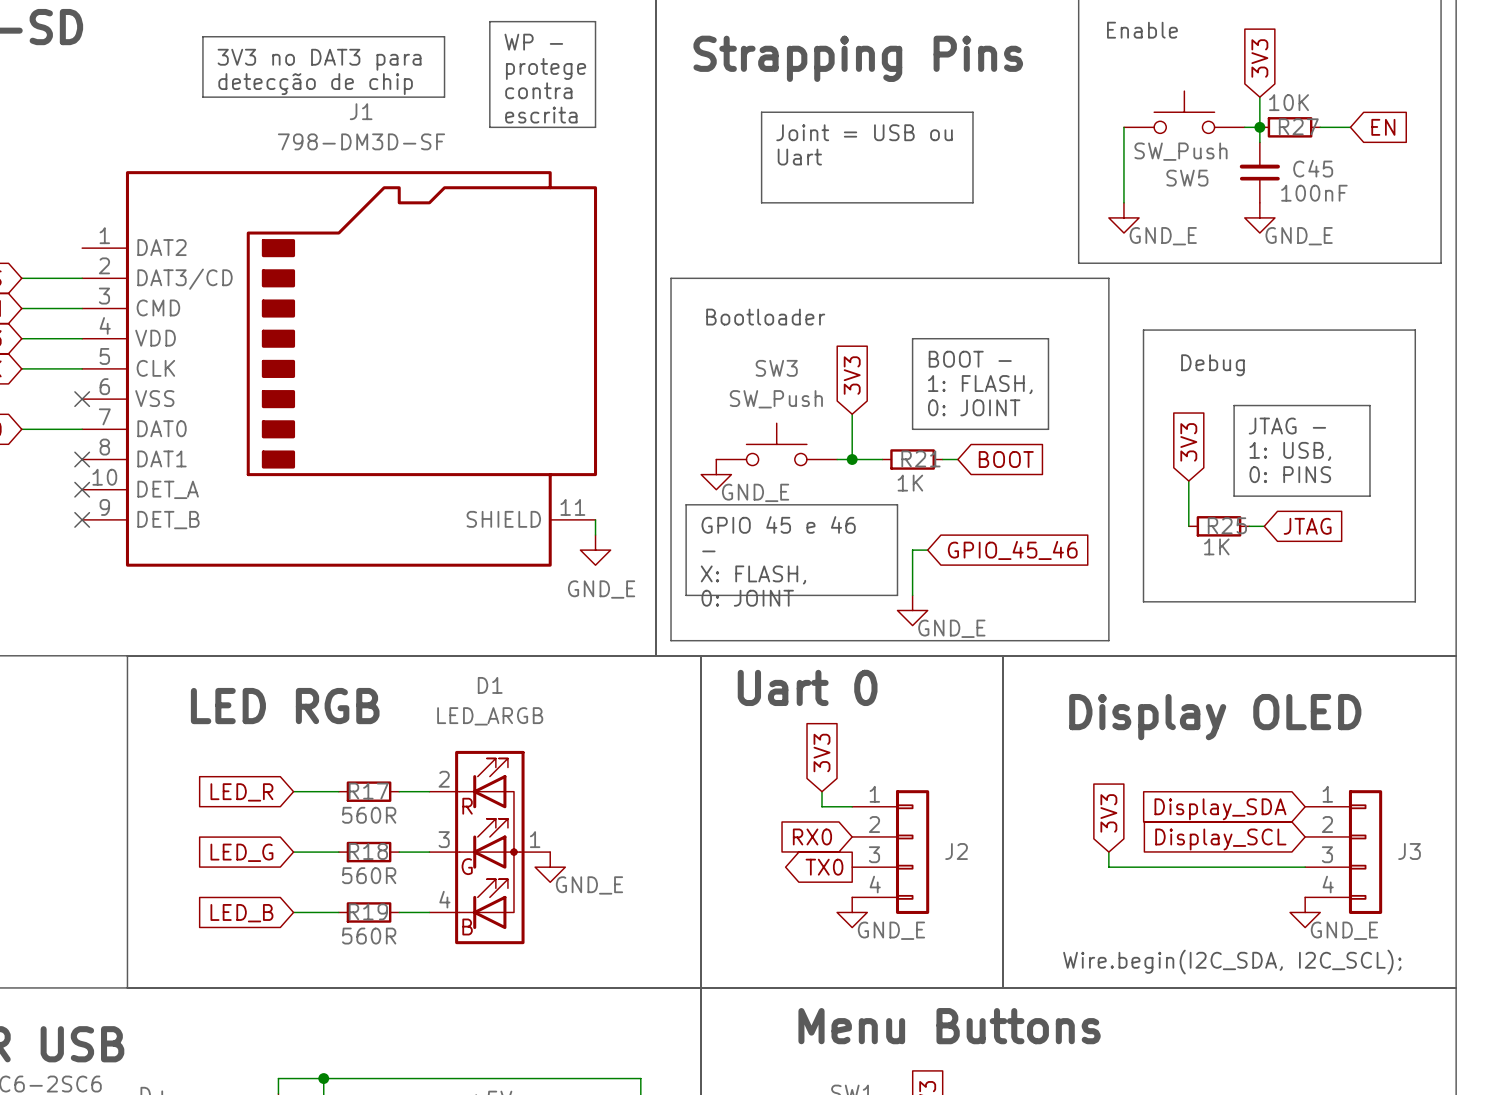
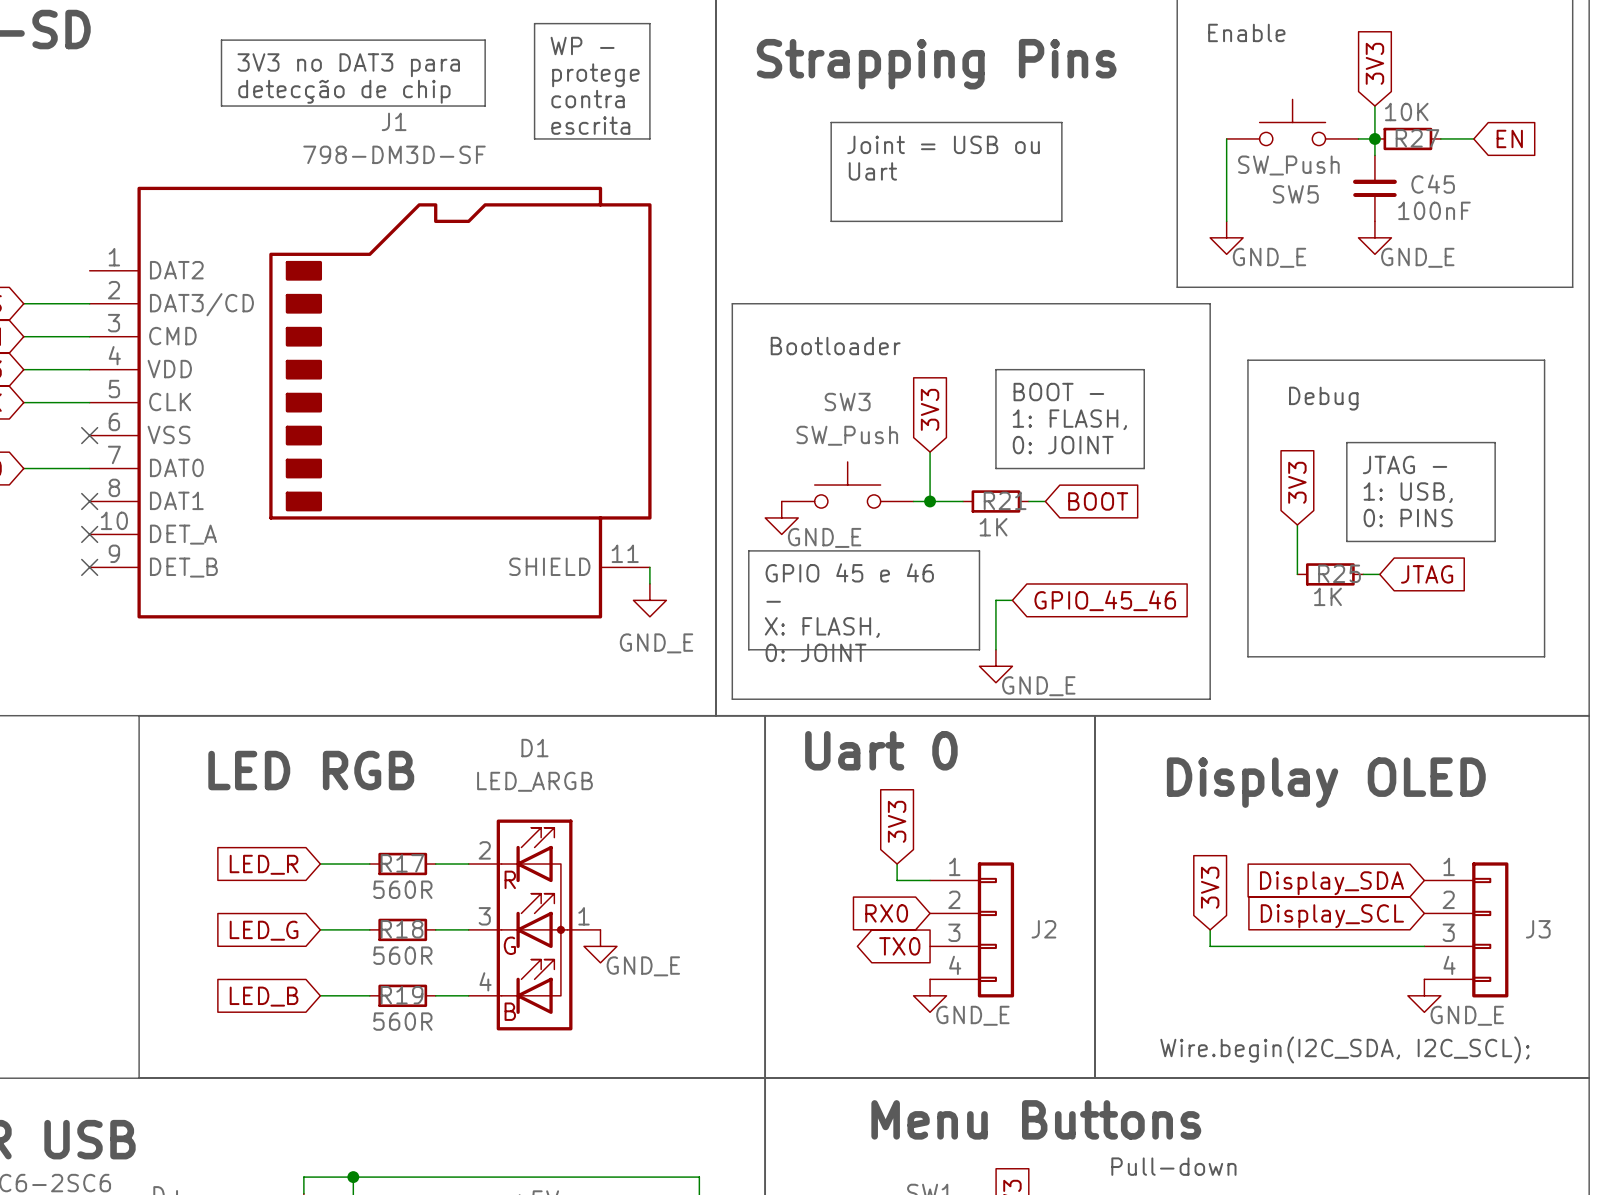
text: none -> Pull-down (1173, 1166)

